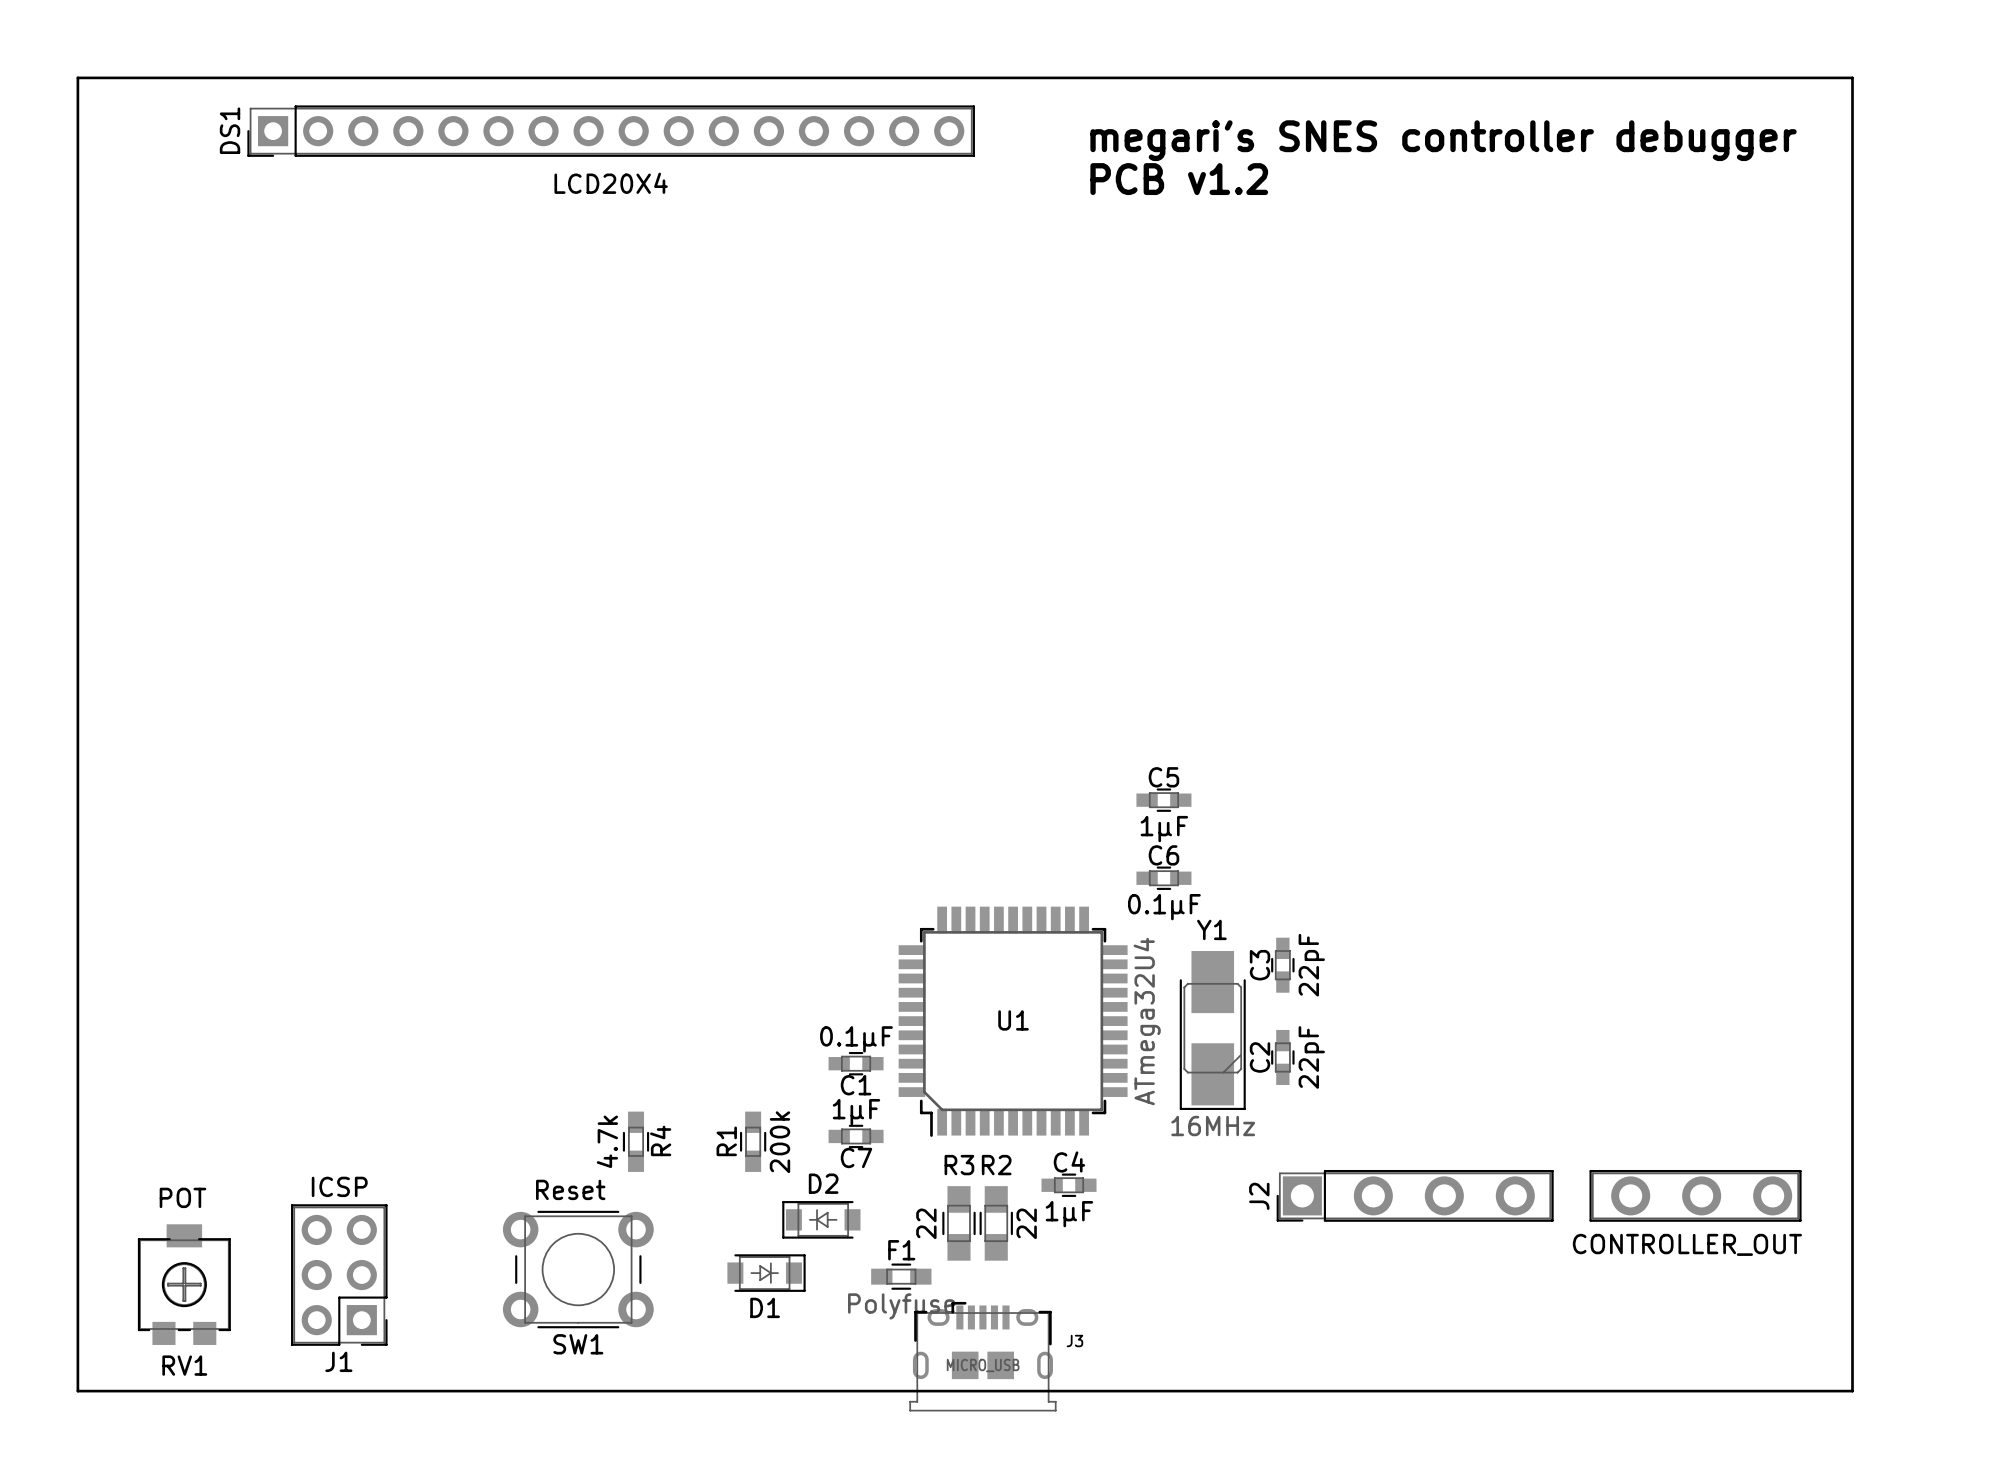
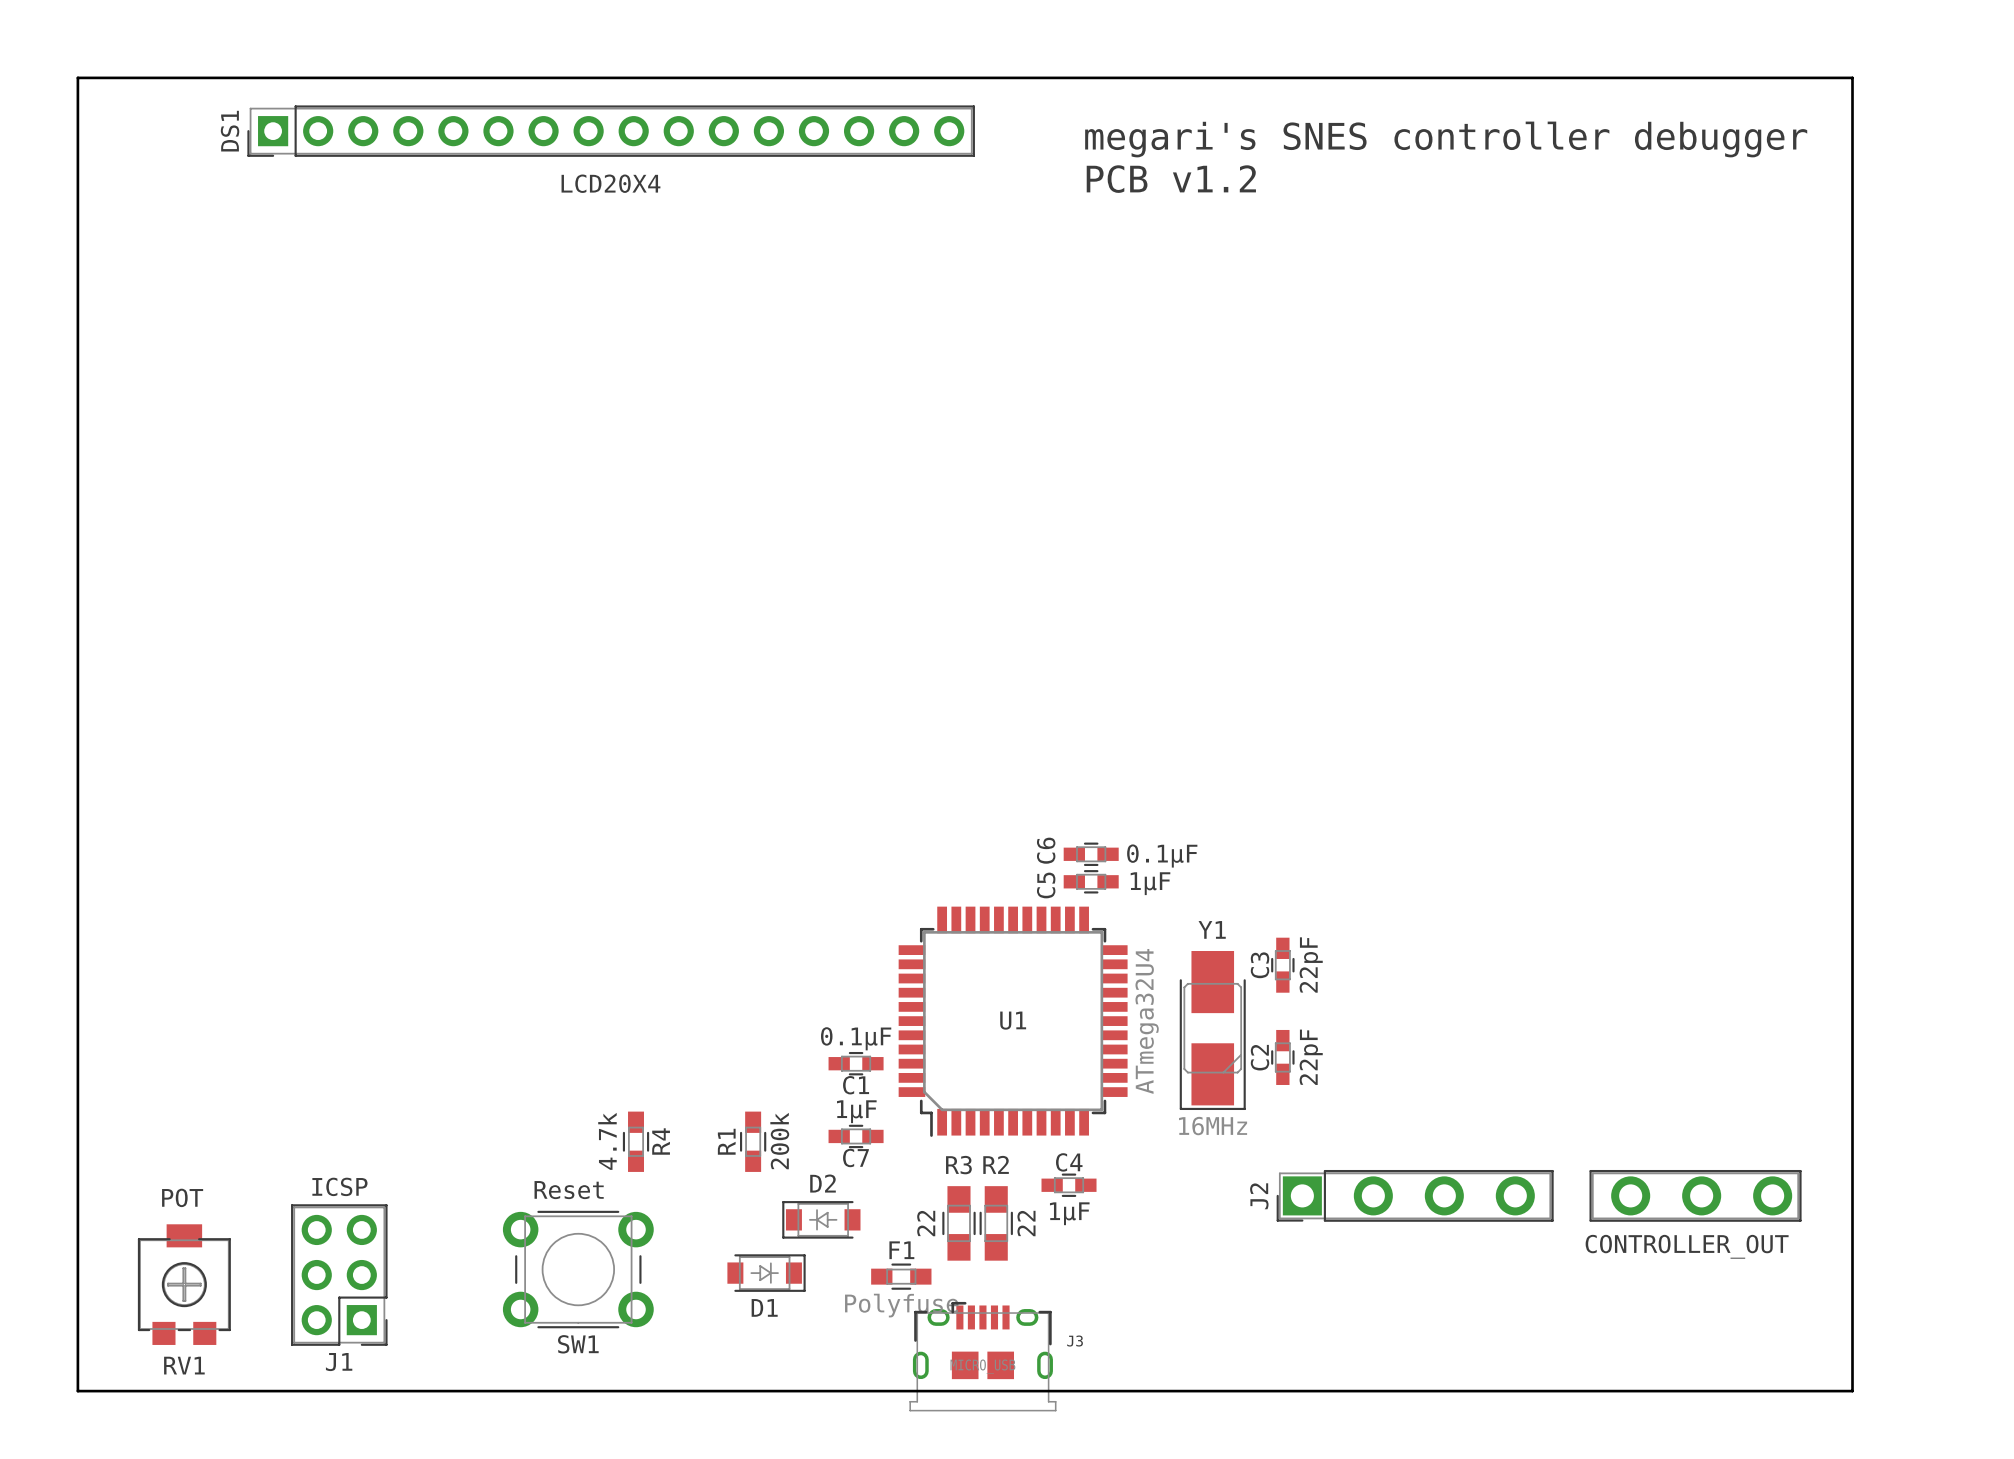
C5 name rotation: 0° (1163, 777) -> 90° counterclockwise (1046, 885)
C5 name position: C5 (1163, 777) -> C5 (1046, 885)
C5 position: (1163, 800) -> (1091, 881)
C5 value position: 1µF (1164, 829) -> 1µF (1150, 883)
C6 name rotation: 0° (1163, 855) -> 90° counterclockwise (1046, 850)
C6 name position: C6 (1163, 855) -> C6 (1046, 850)
C6 position: (1163, 878) -> (1091, 854)
C6 value position: 0.1µF (1164, 907) -> 0.1µF (1162, 856)

